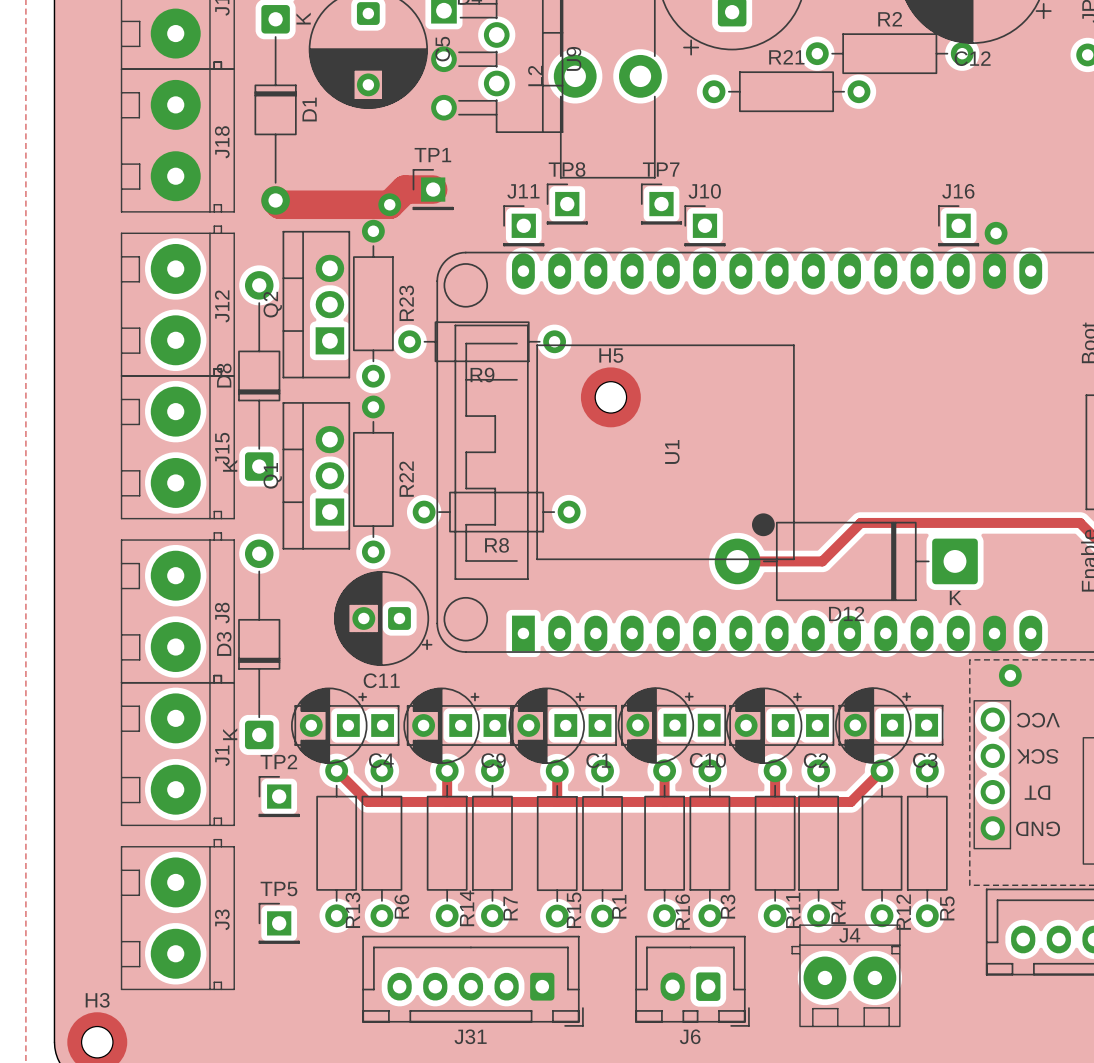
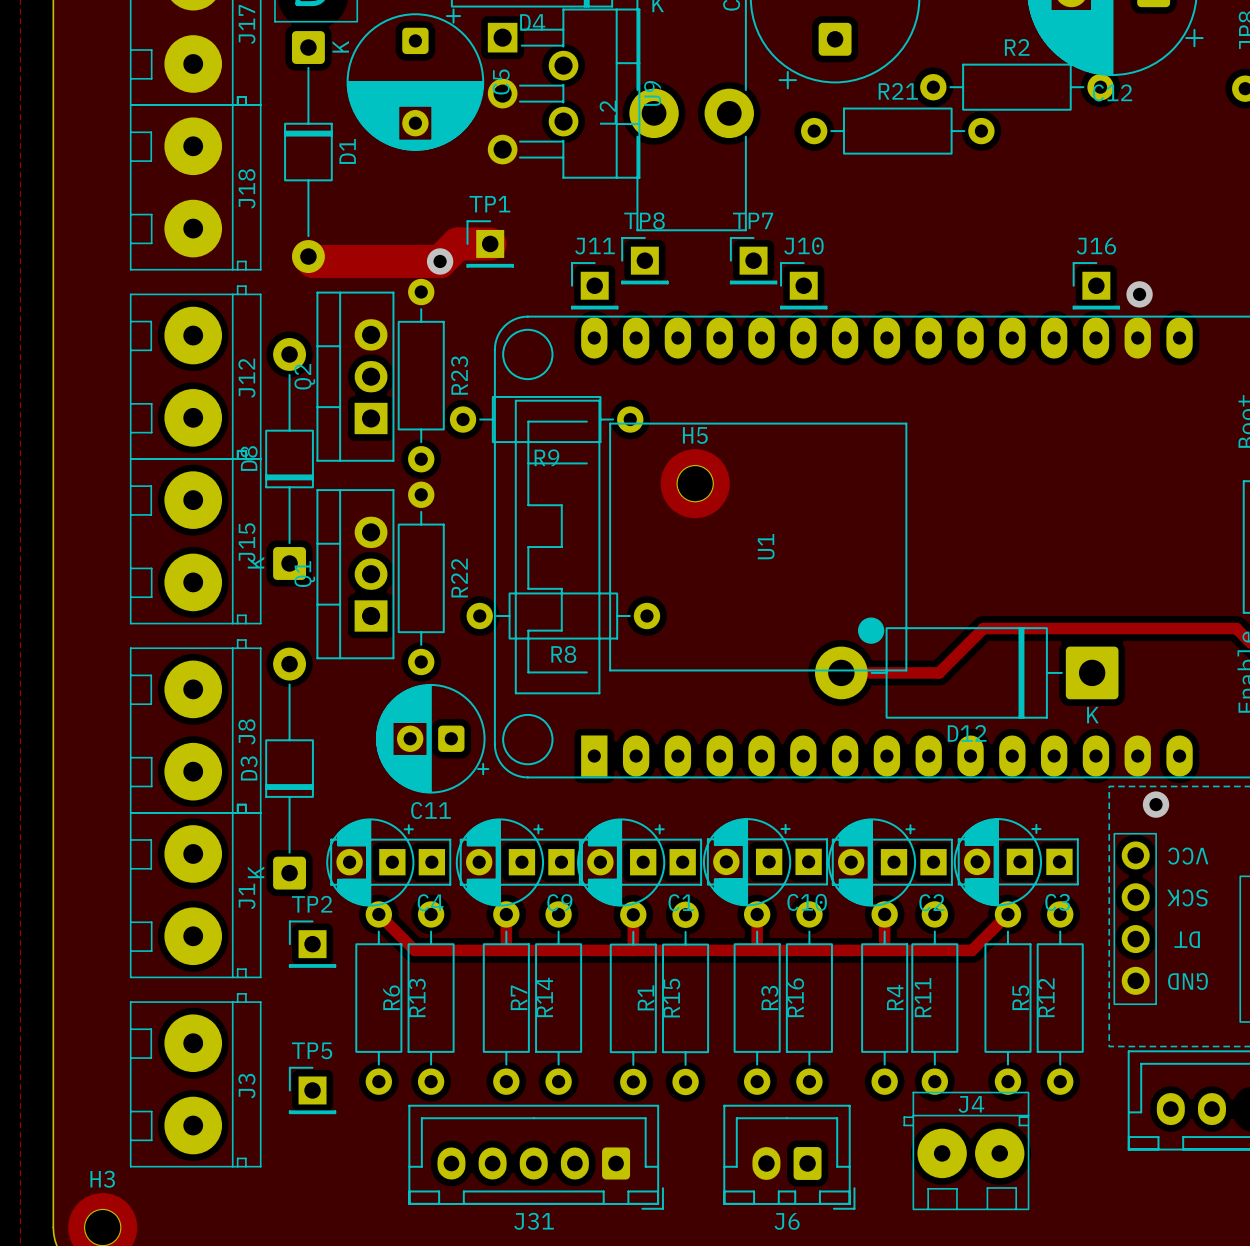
R6 name position: R6 (401, 906) -> R6 (391, 997)
R1 name position: R1 (619, 906) -> R1 (645, 997)
R3 name position: R3 (727, 906) -> R3 (769, 997)
R14 name position: R14 (467, 908) -> R14 (544, 997)
R7 name position: R7 (510, 908) -> R7 (518, 997)
R5 name position: R5 (947, 908) -> R5 (1020, 997)
R13 name position: R13 (352, 910) -> R13 (417, 997)
R15 name position: R15 (574, 910) -> R15 (671, 998)
R11 name position: R11 (793, 910) -> R11 (923, 997)
R4 name position: R4 (838, 911) -> R4 (895, 997)
R16 name position: R16 (682, 912) -> R16 (795, 997)
R12 name position: R12 (903, 912) -> R12 (1046, 997)

